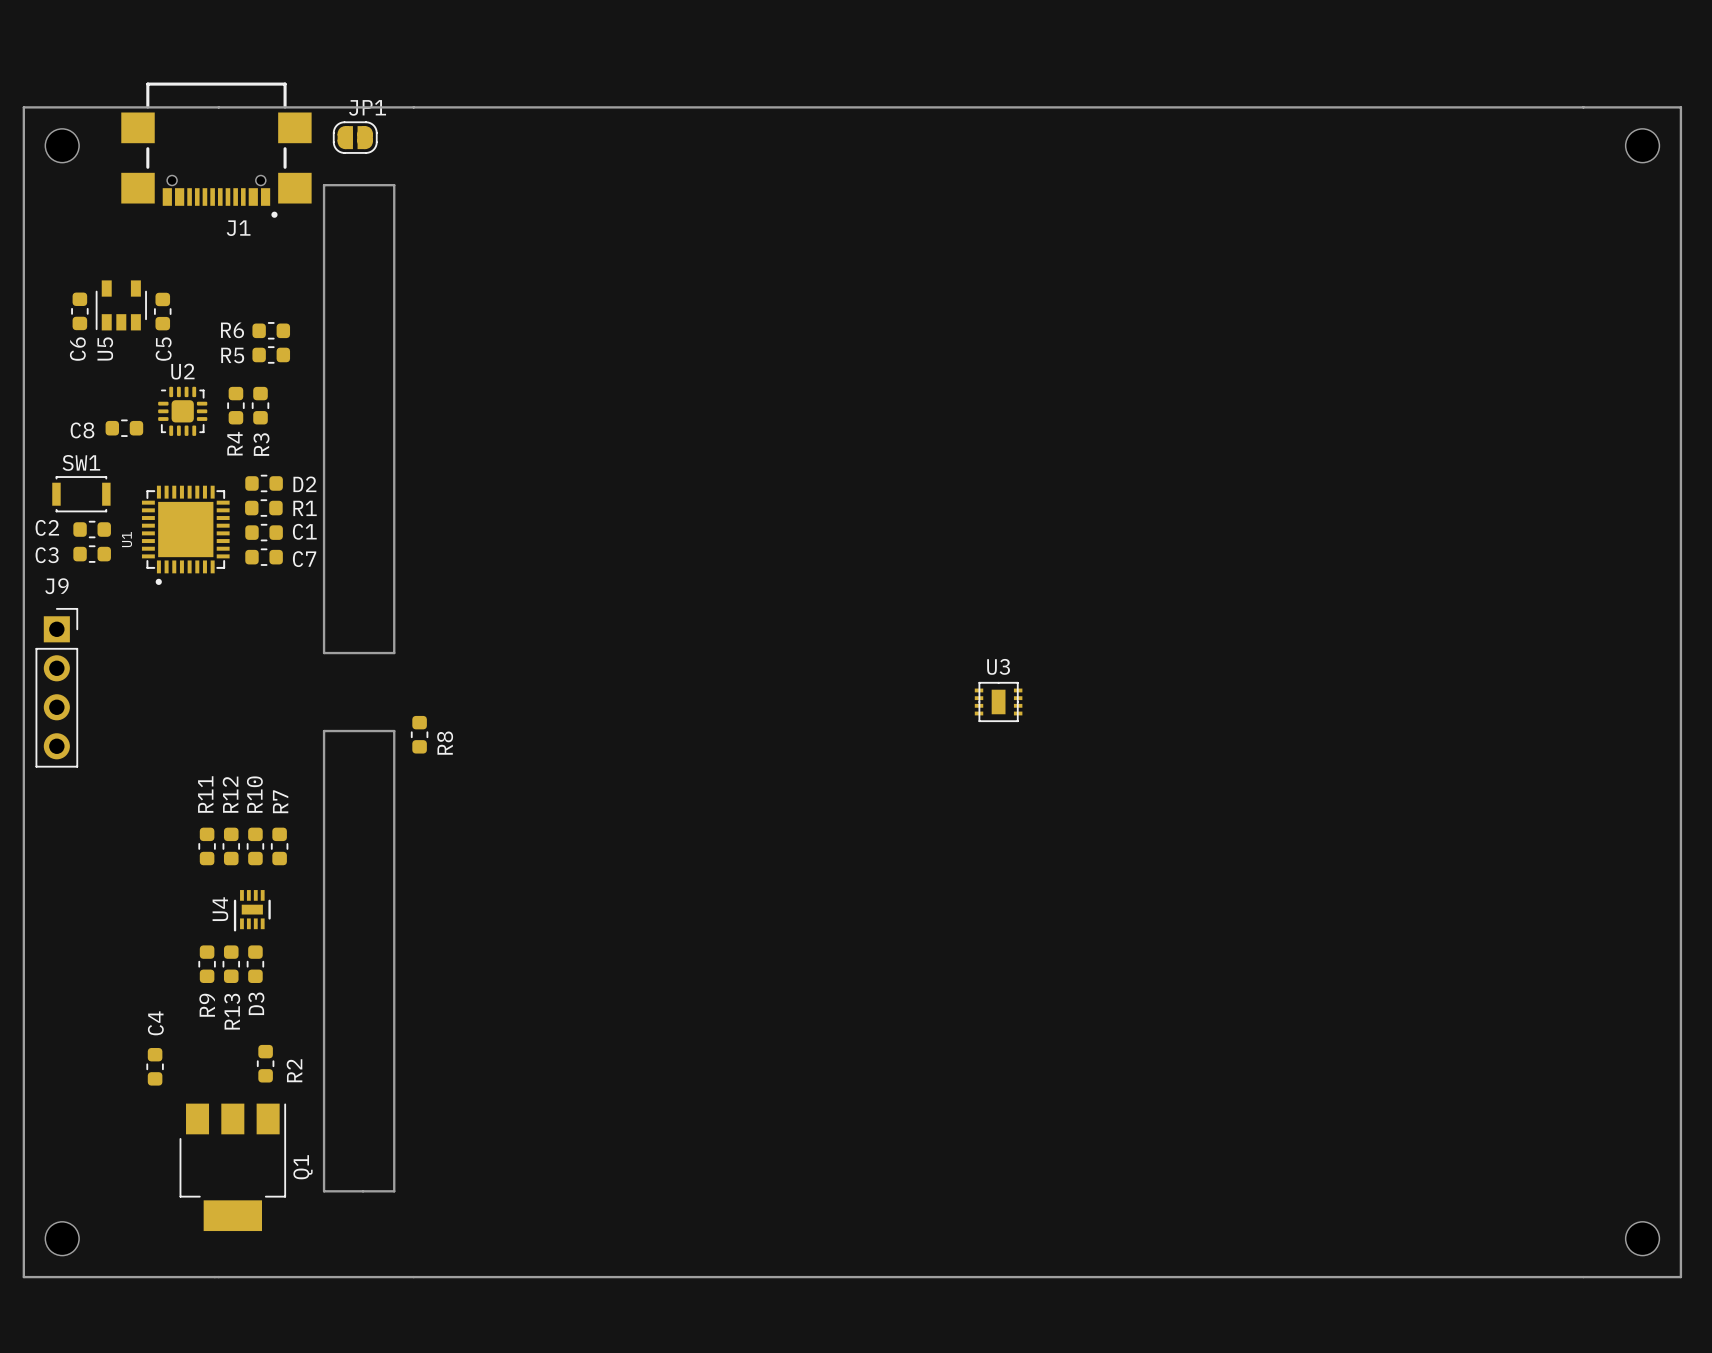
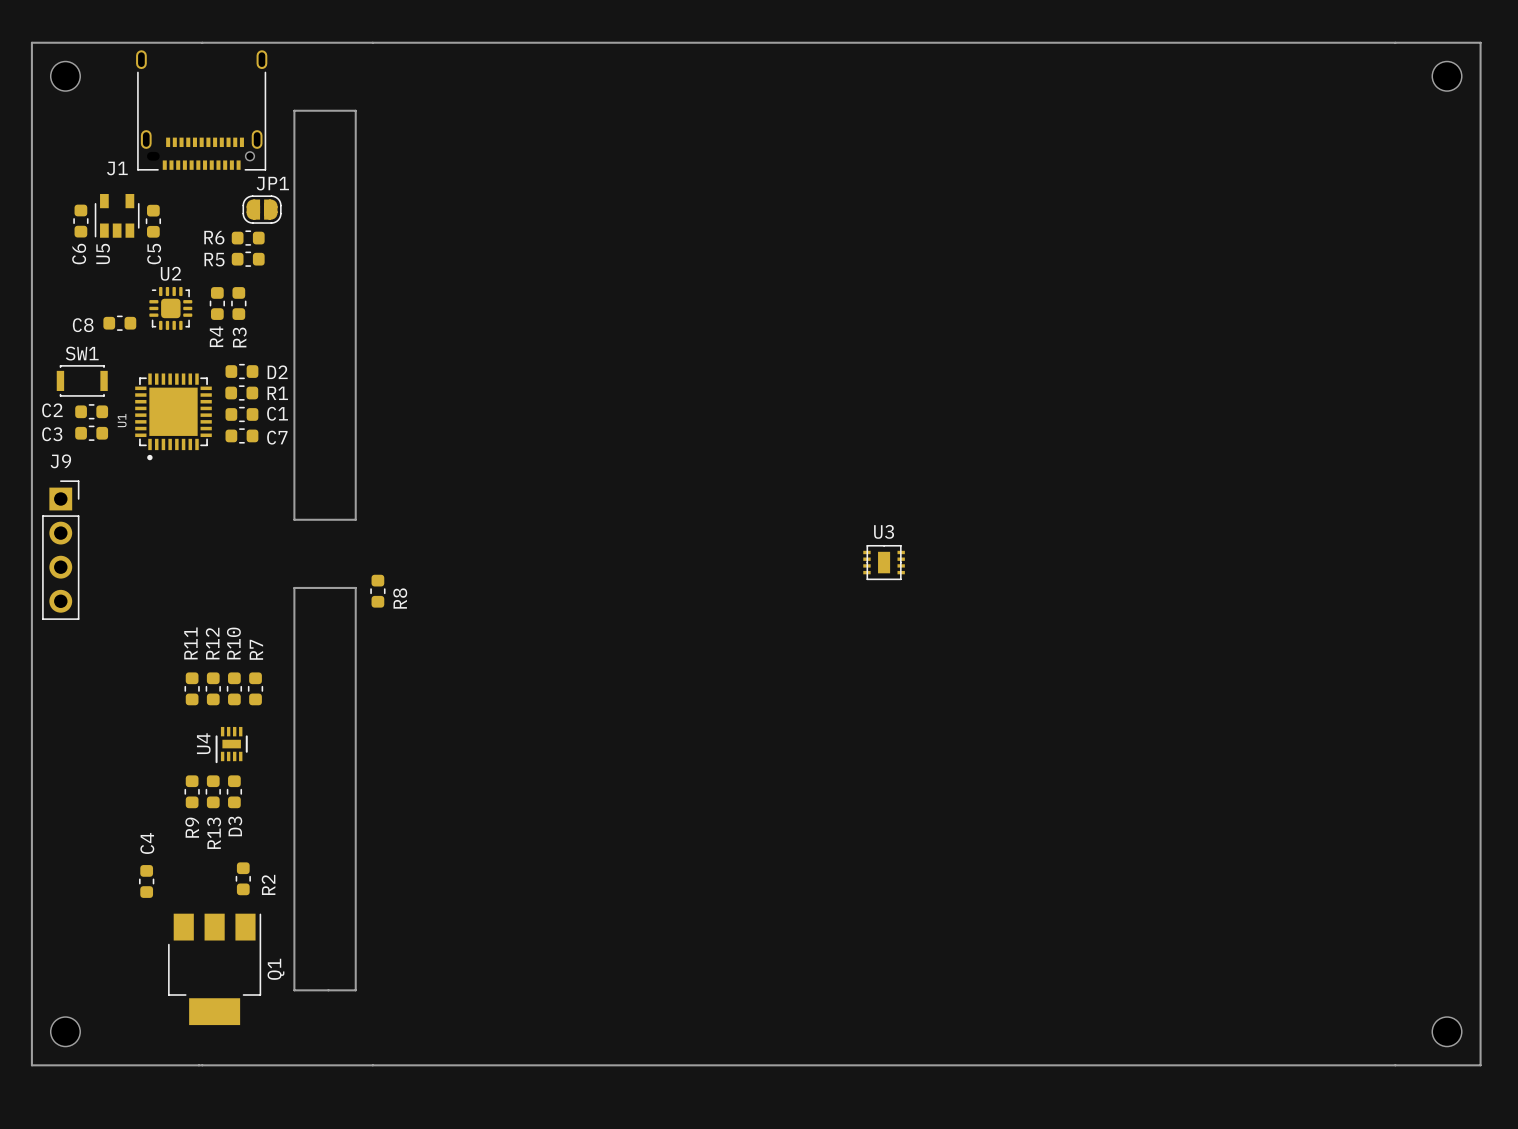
J1 footprint: [121, 82, 312, 218] -> [136, 50, 268, 171]
JP1 position: (355, 137) -> (262, 209)
J1 name position: J1 (238, 228) -> J1 (117, 168)

